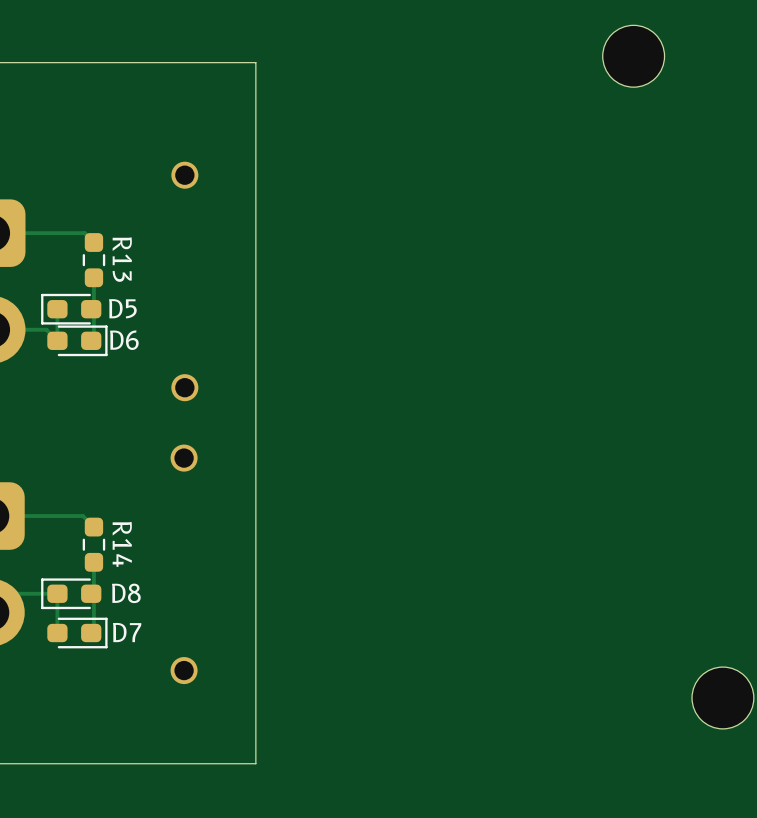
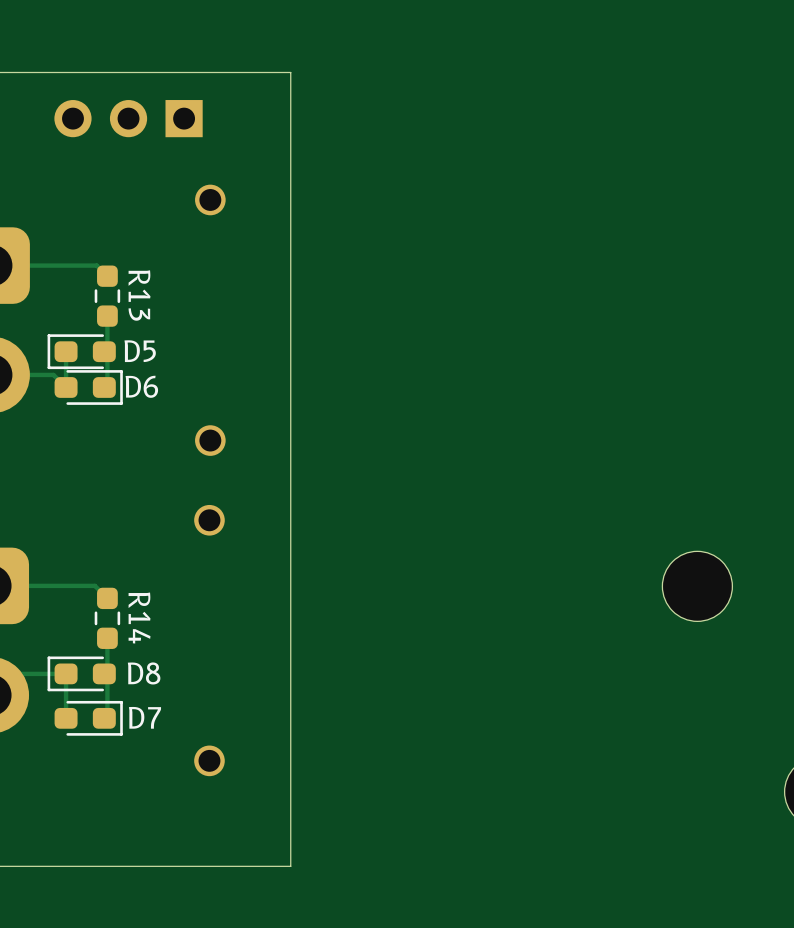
part position: (633, 56) -> (697, 586)
part: none -> (128, 118)

